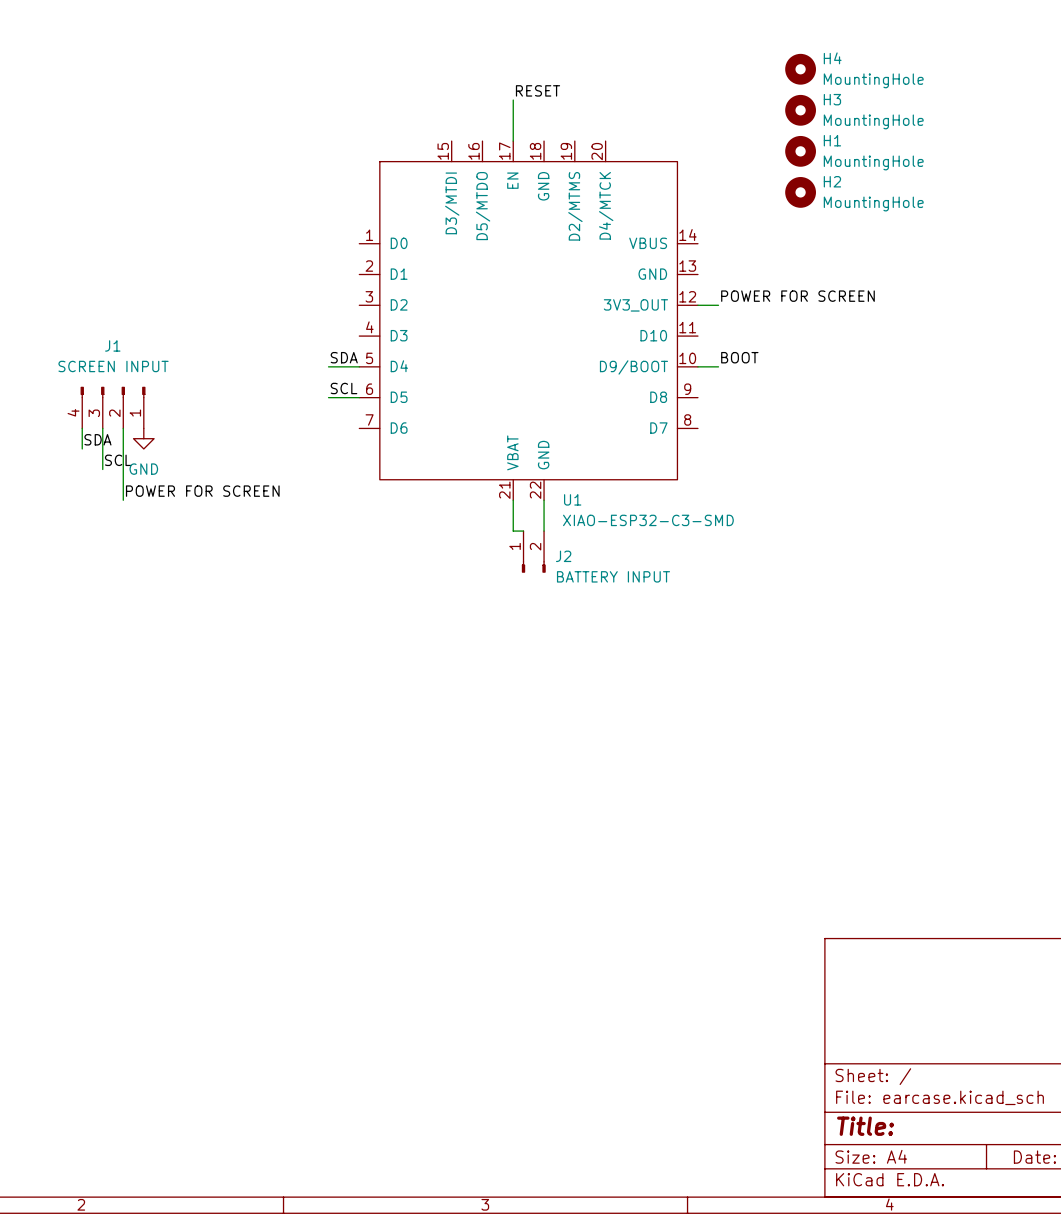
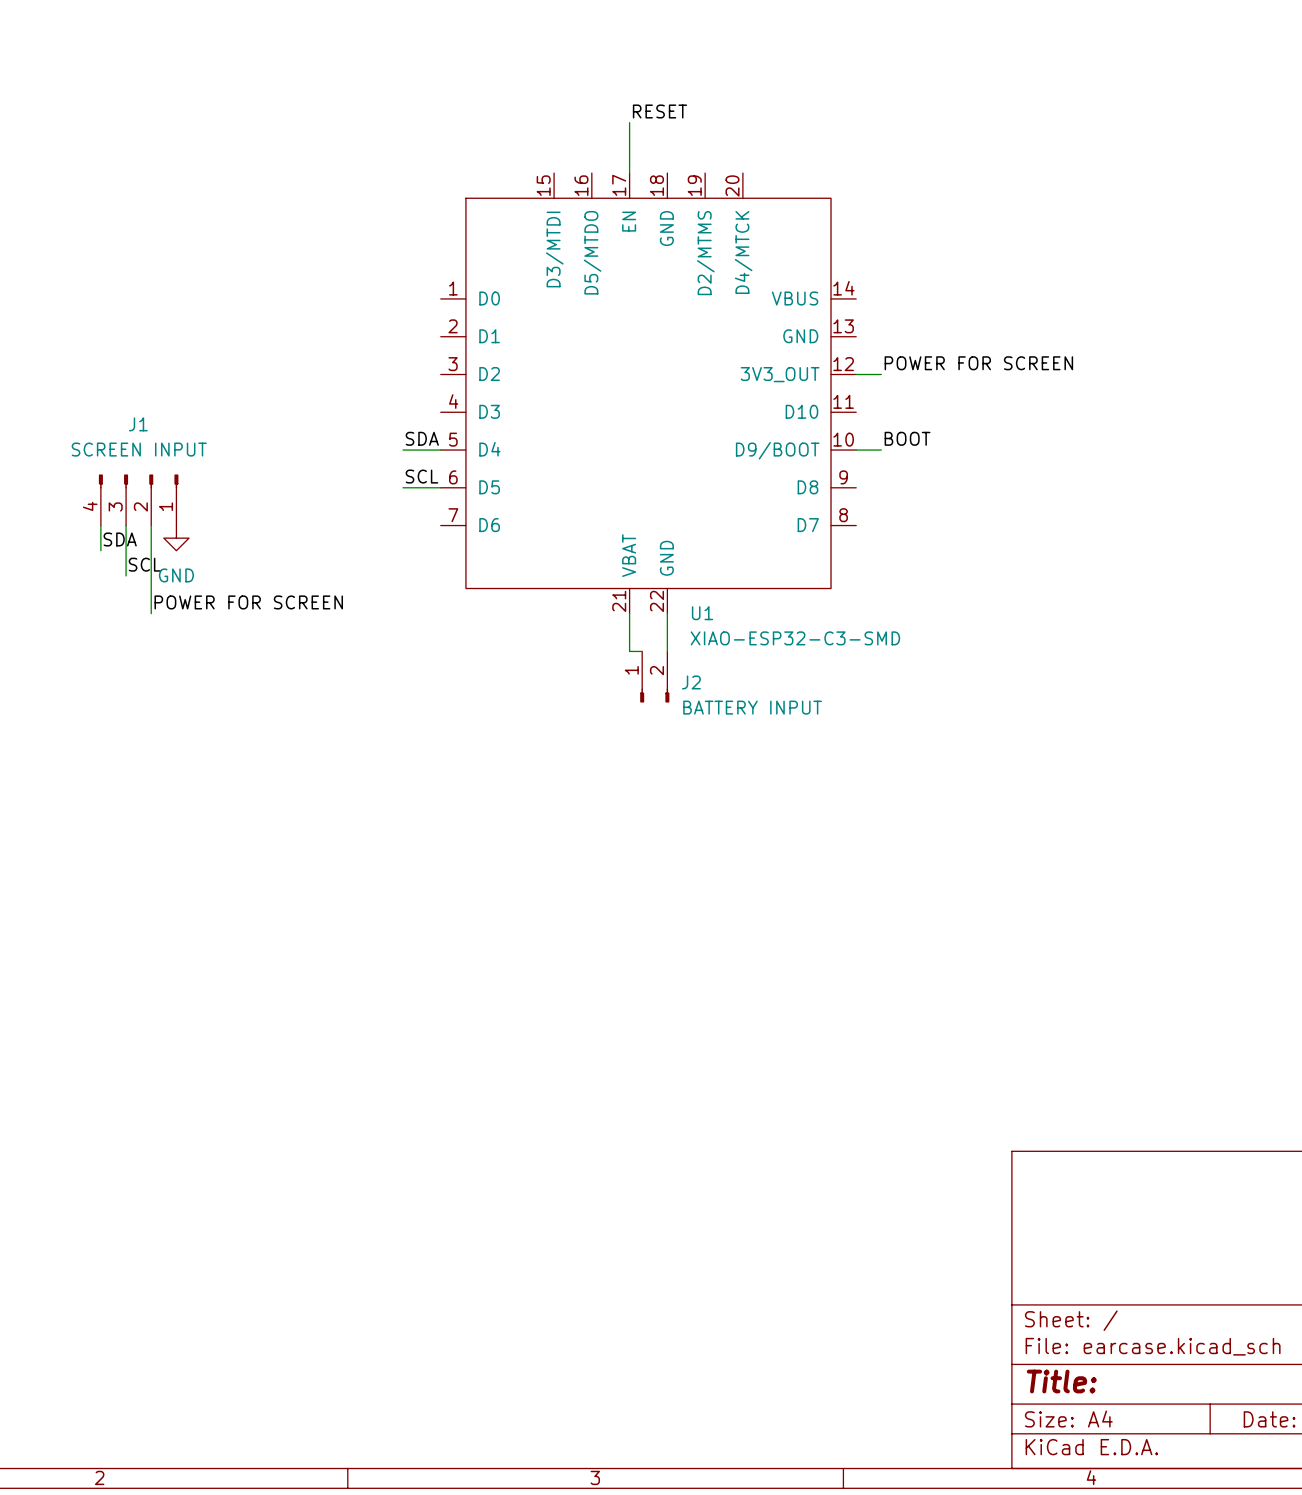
H4: MountingHole (800, 69) -> none
H3: MountingHole (800, 110) -> none
H1: MountingHole (800, 151) -> none
H2: MountingHole (800, 192) -> none

